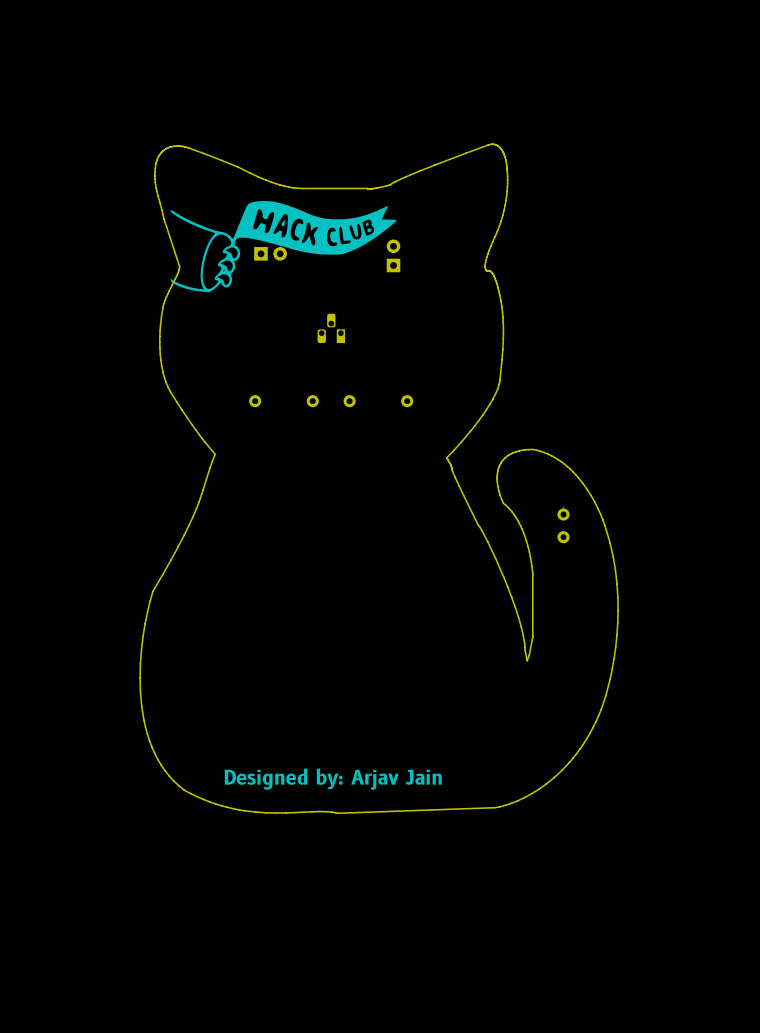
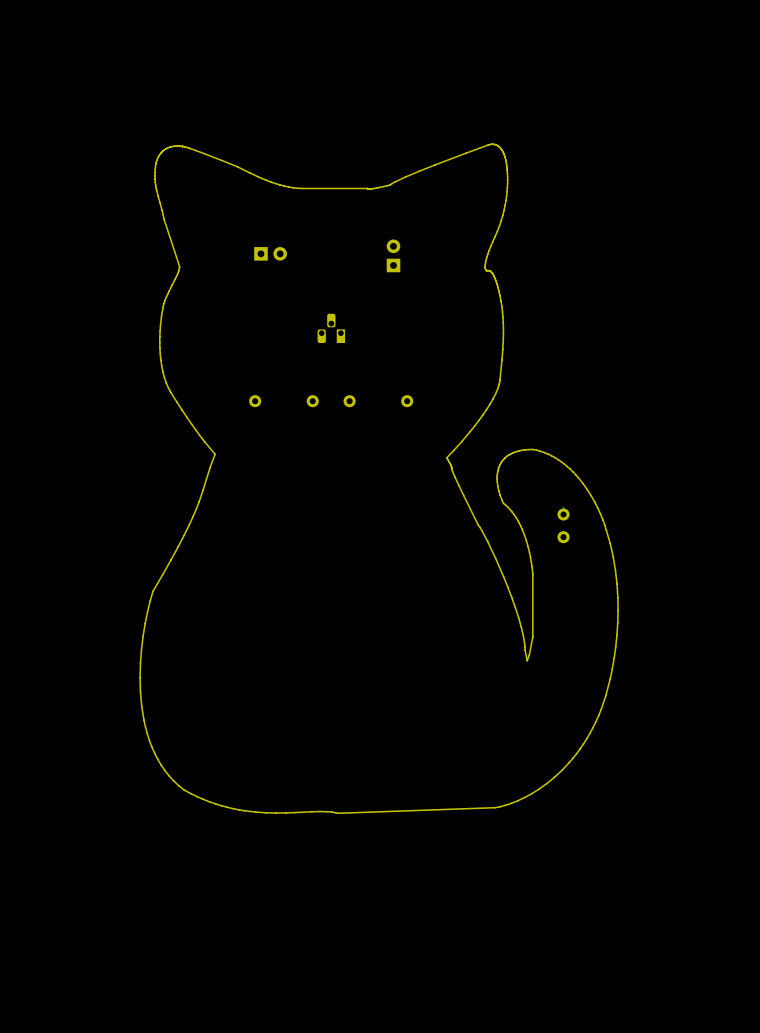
drawing: [170, 201, 397, 293] -> none
text: Designed by: Arjav Jain (333, 779) -> none

